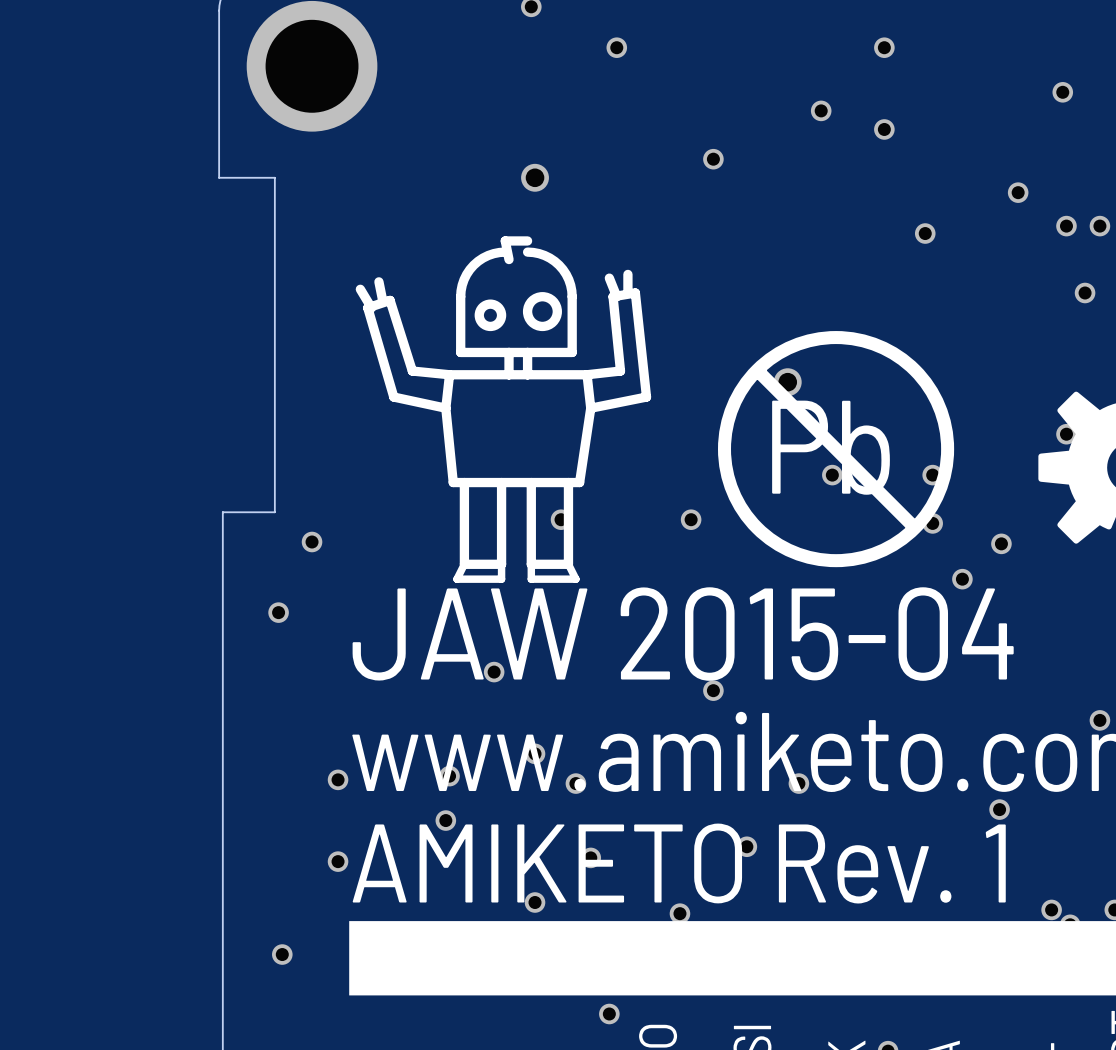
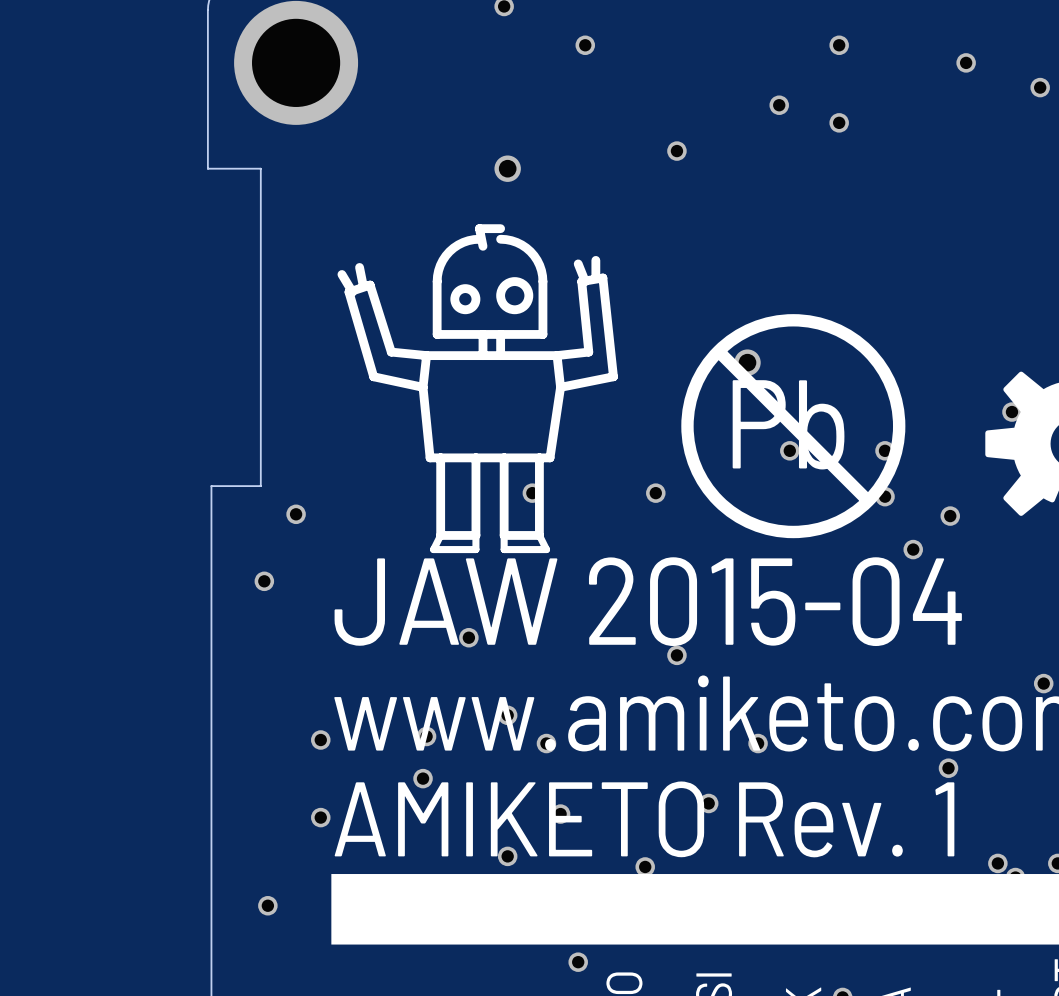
via: none -> (966, 62)
via: (1062, 92) -> none
via: none -> (1040, 87)
via: (1018, 192) -> none
via: (1066, 226) -> none
via: (1099, 226) -> none
via: (925, 233) -> none
via: (1085, 292) -> none

